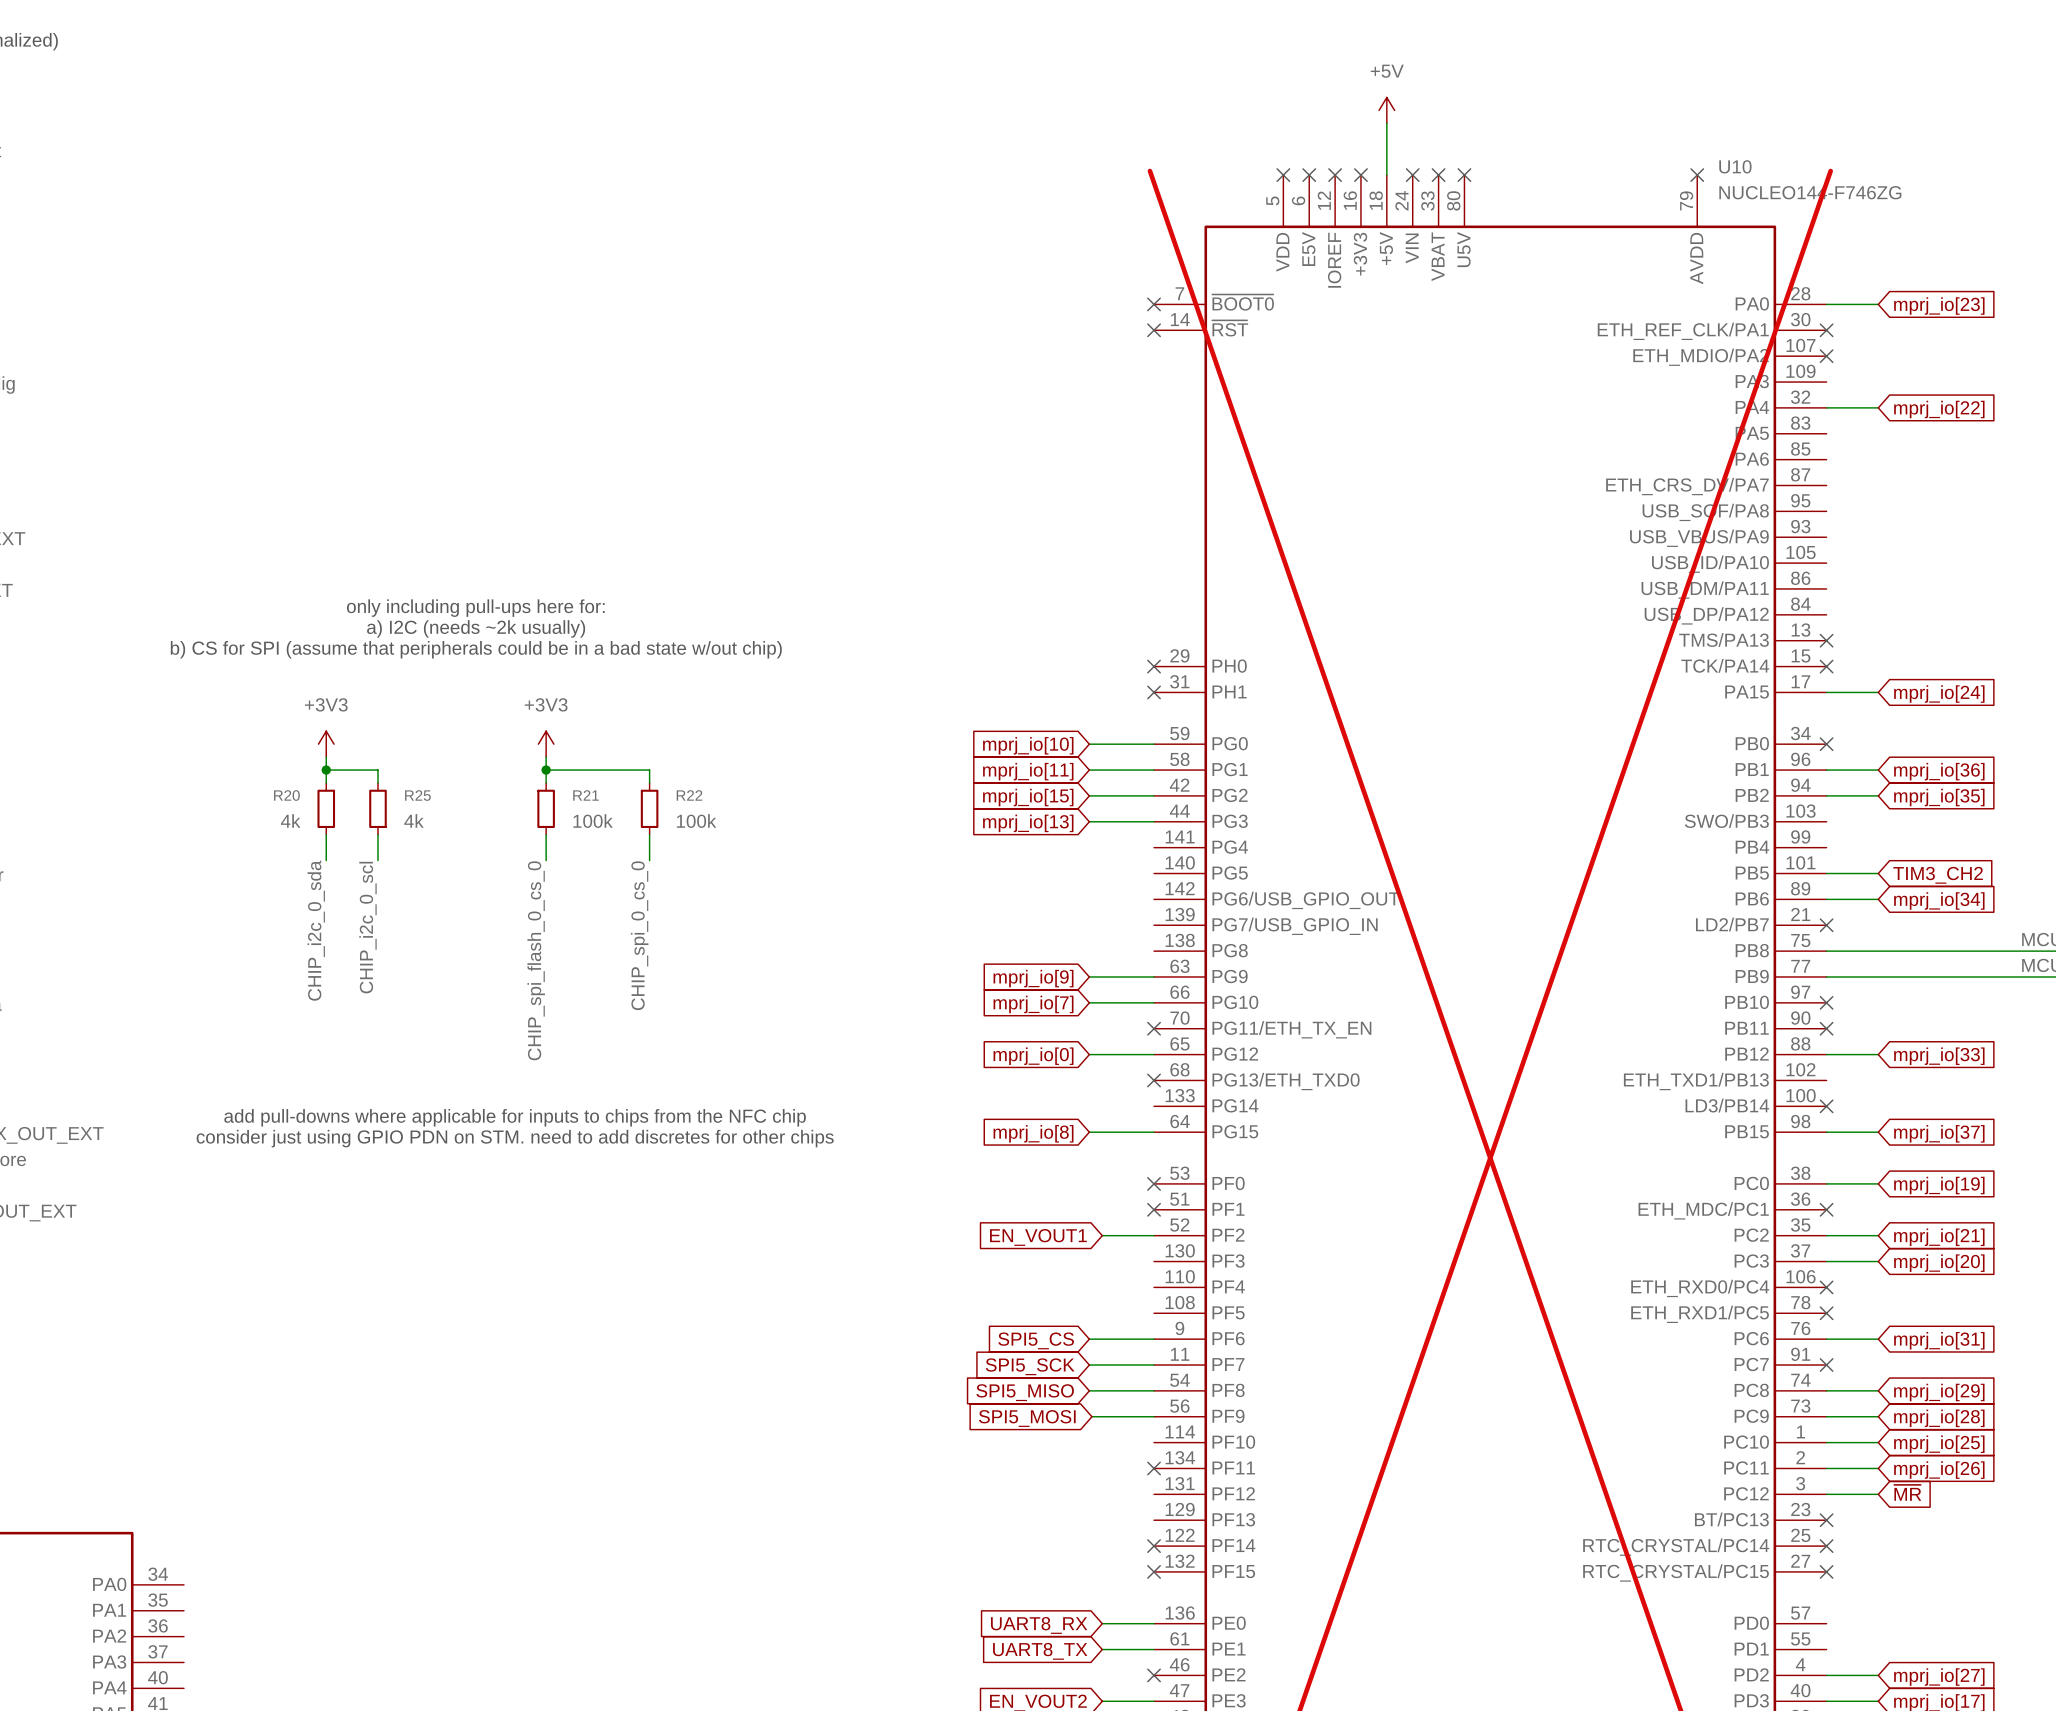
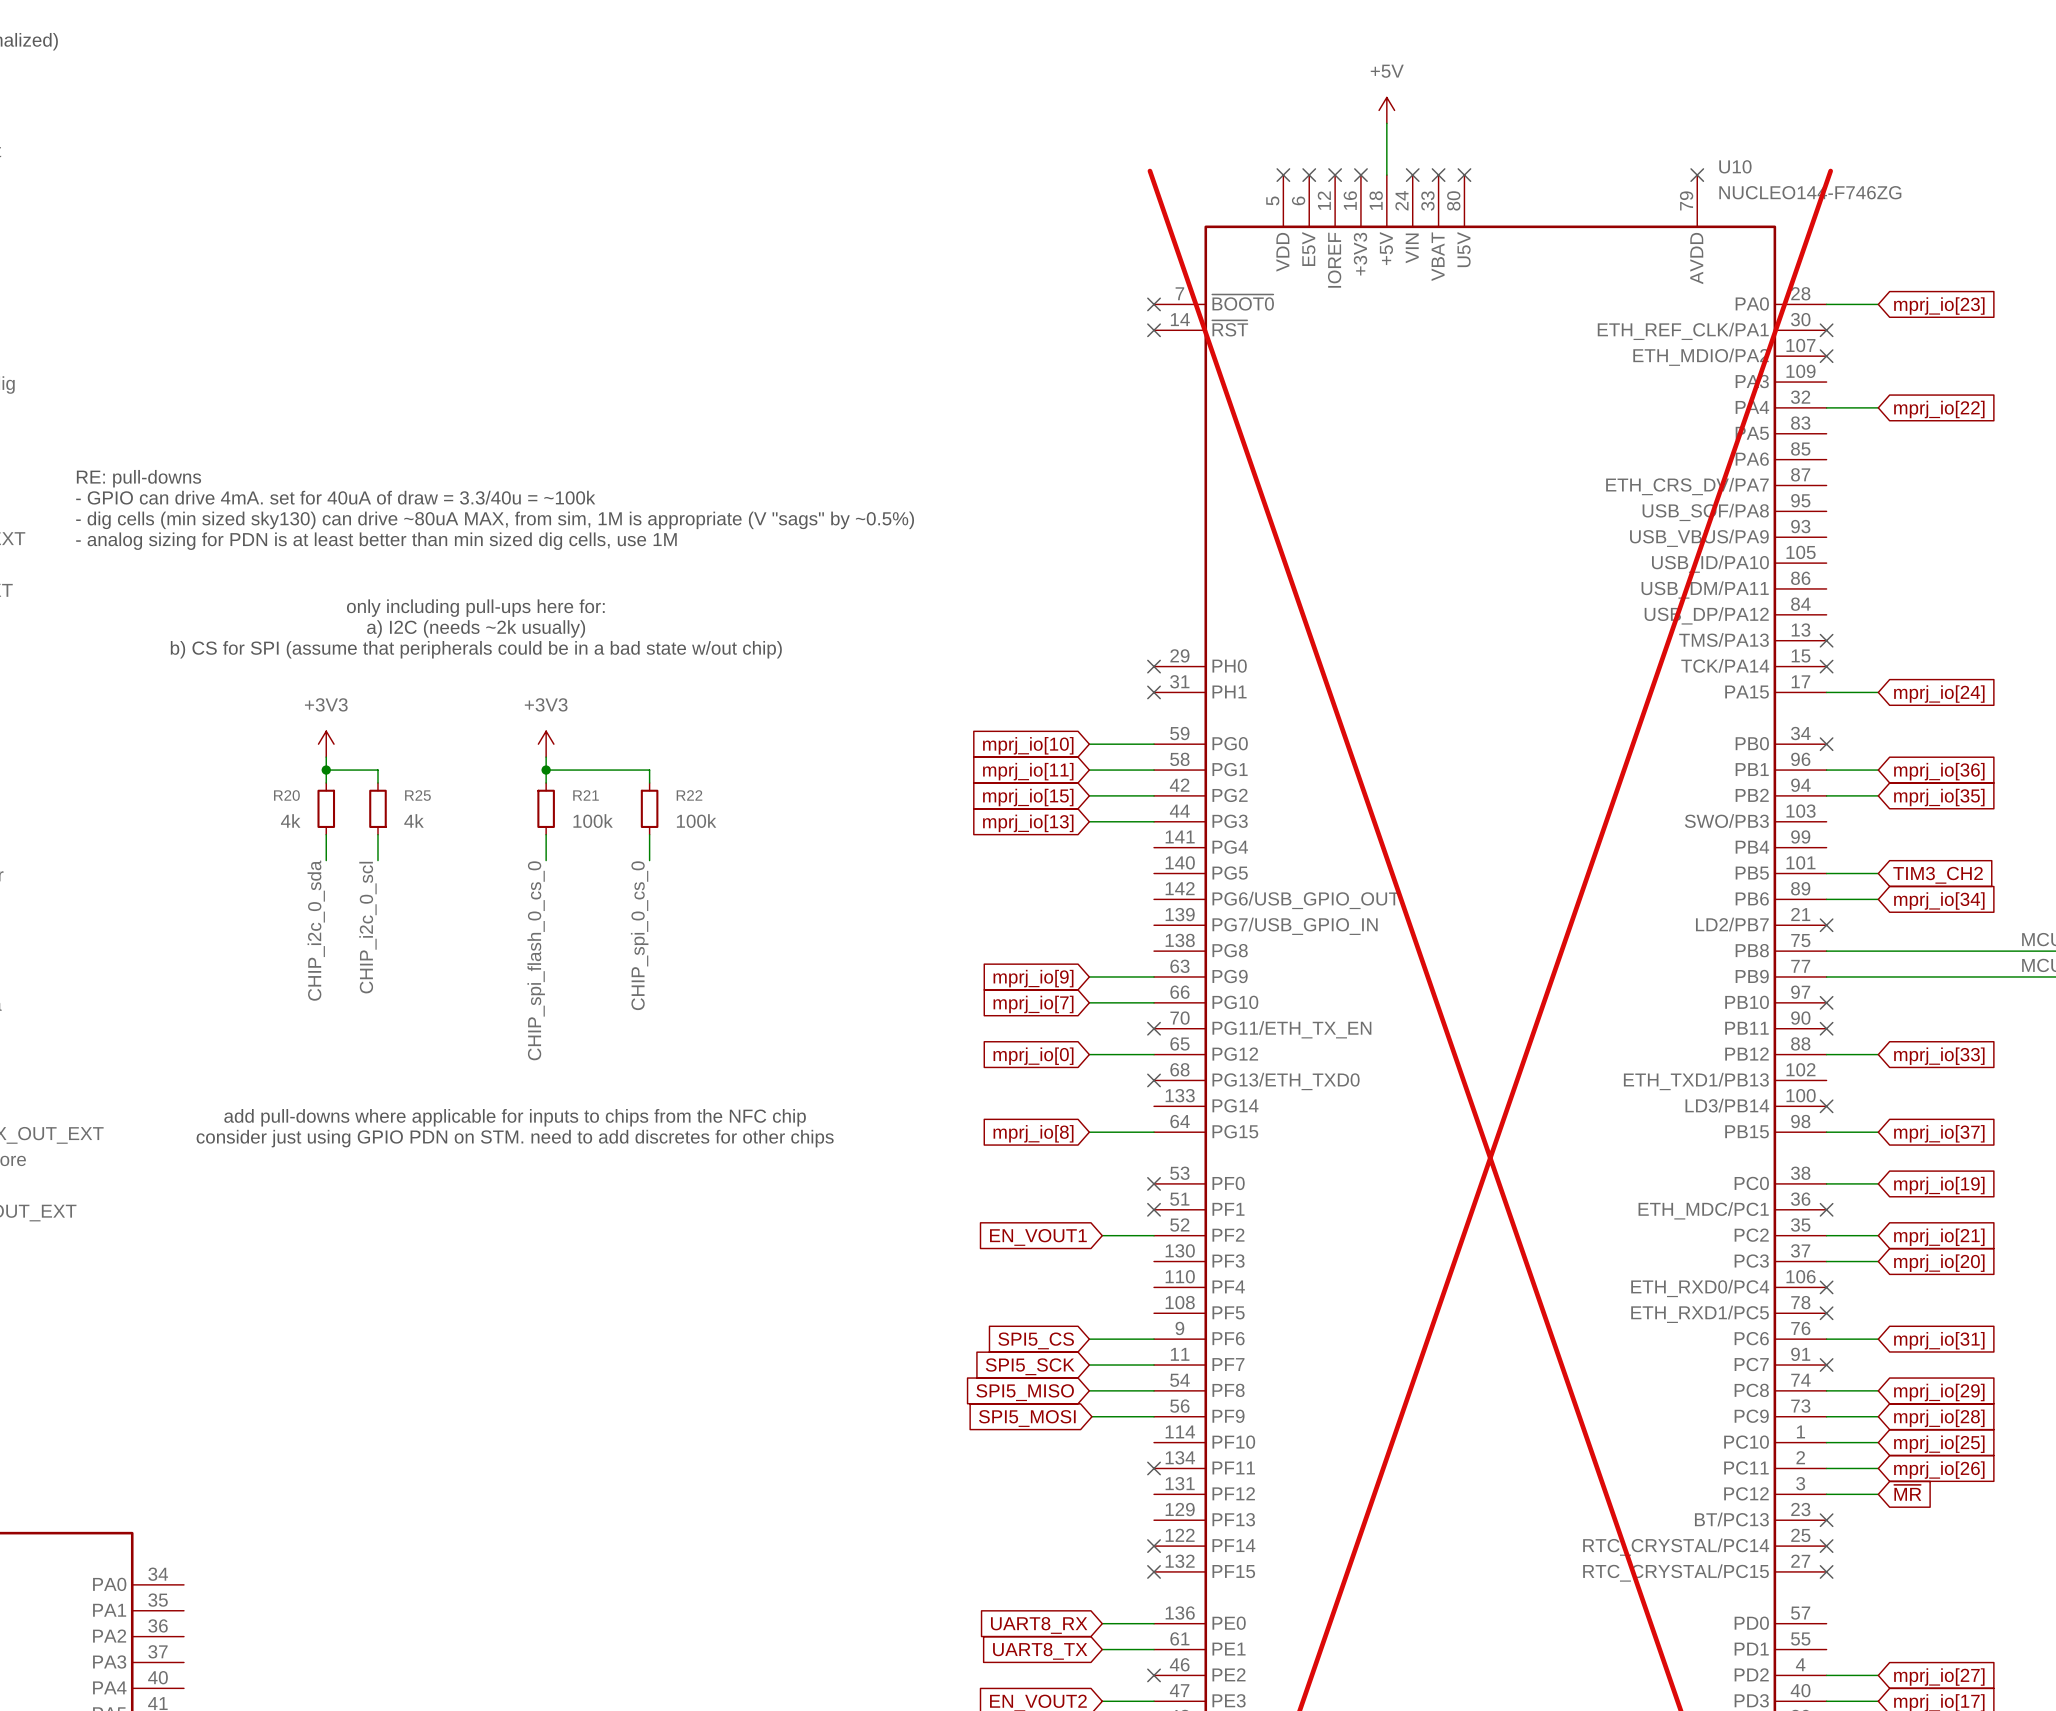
text: none -> RE: pull-downs (138, 478)
text: none -> - GPIO can drive 4mA. set for 40uA of draw = 3.3/40u = ~100k (335, 497)
text: none -> - dig cells (min sized sky130) can drive ~80uA MAX, from sim, 1M is appropriate (V "sags" by ~0.5%) (495, 520)
text: none -> - analog sizing for PDN is at least better than min sized dig cells, use 1M (376, 541)

